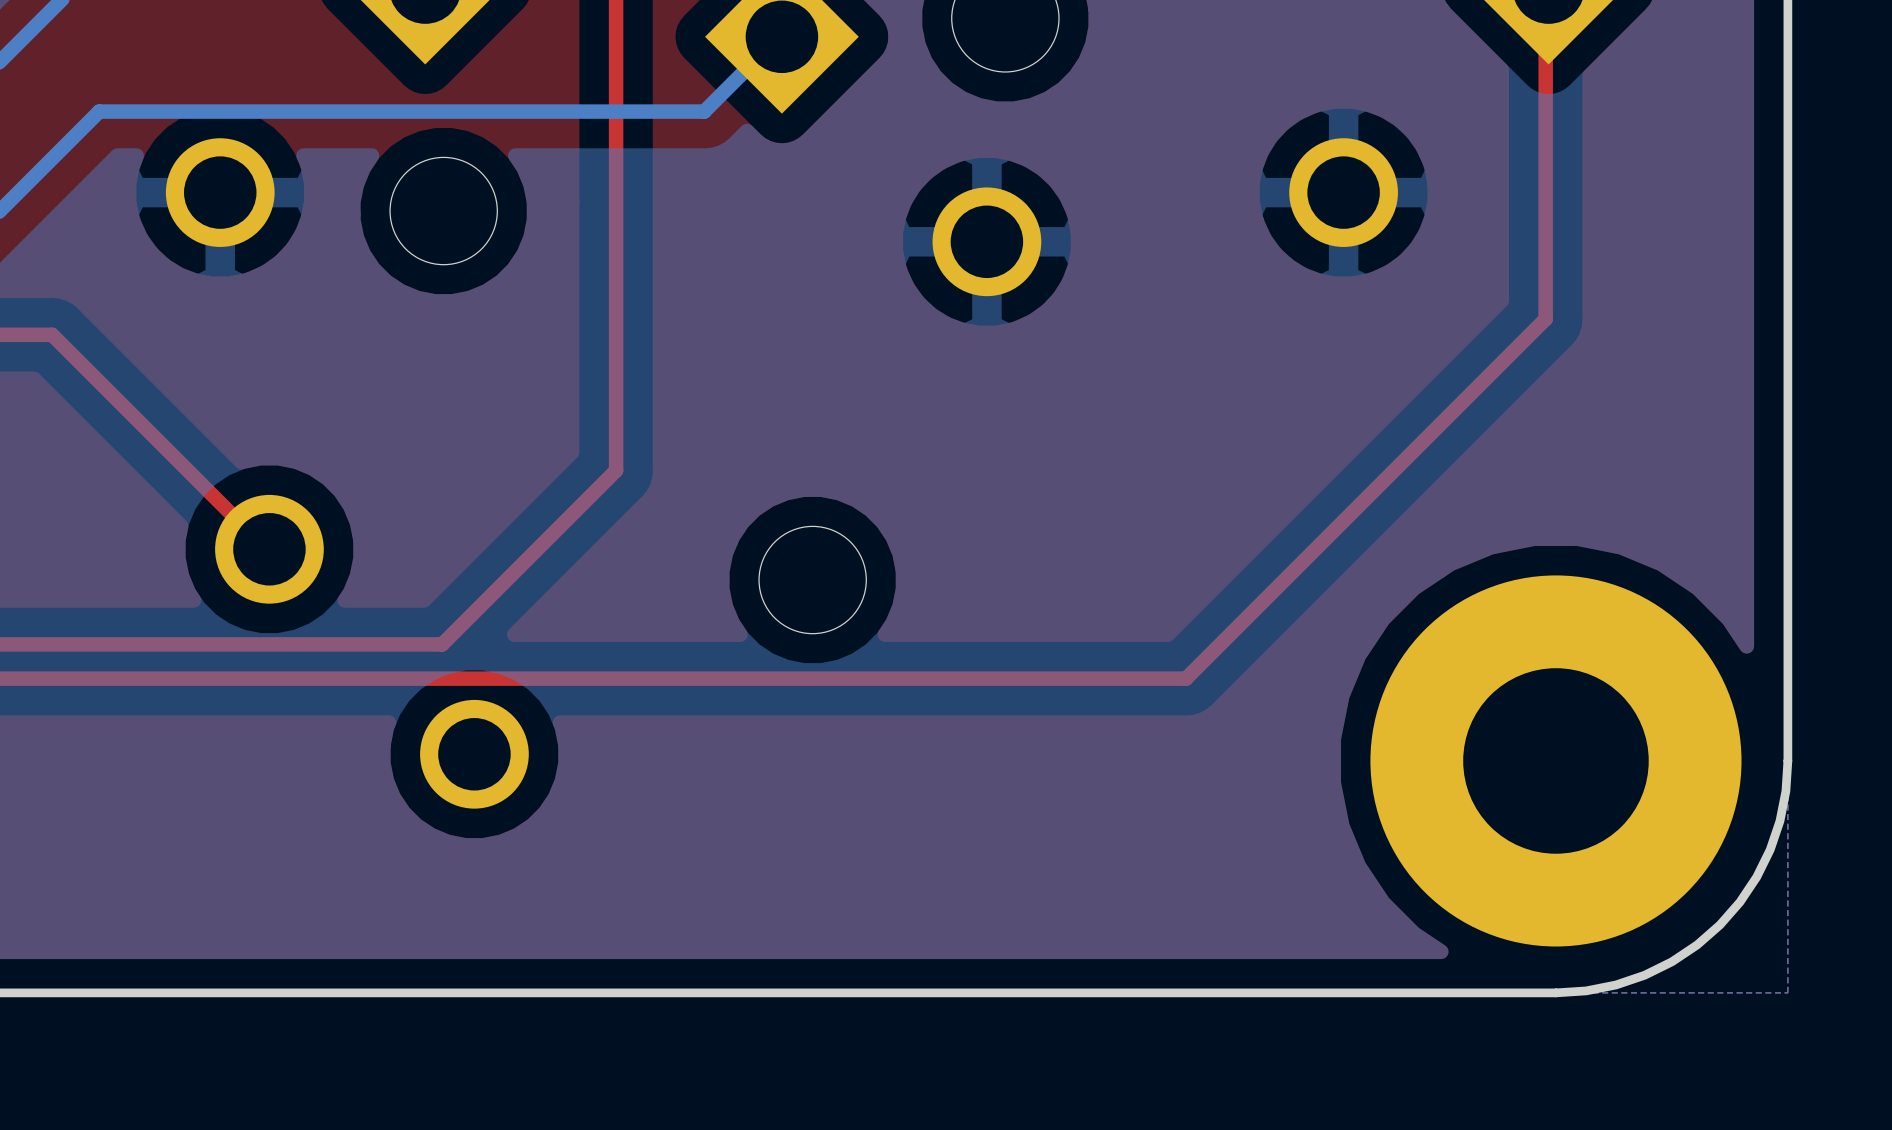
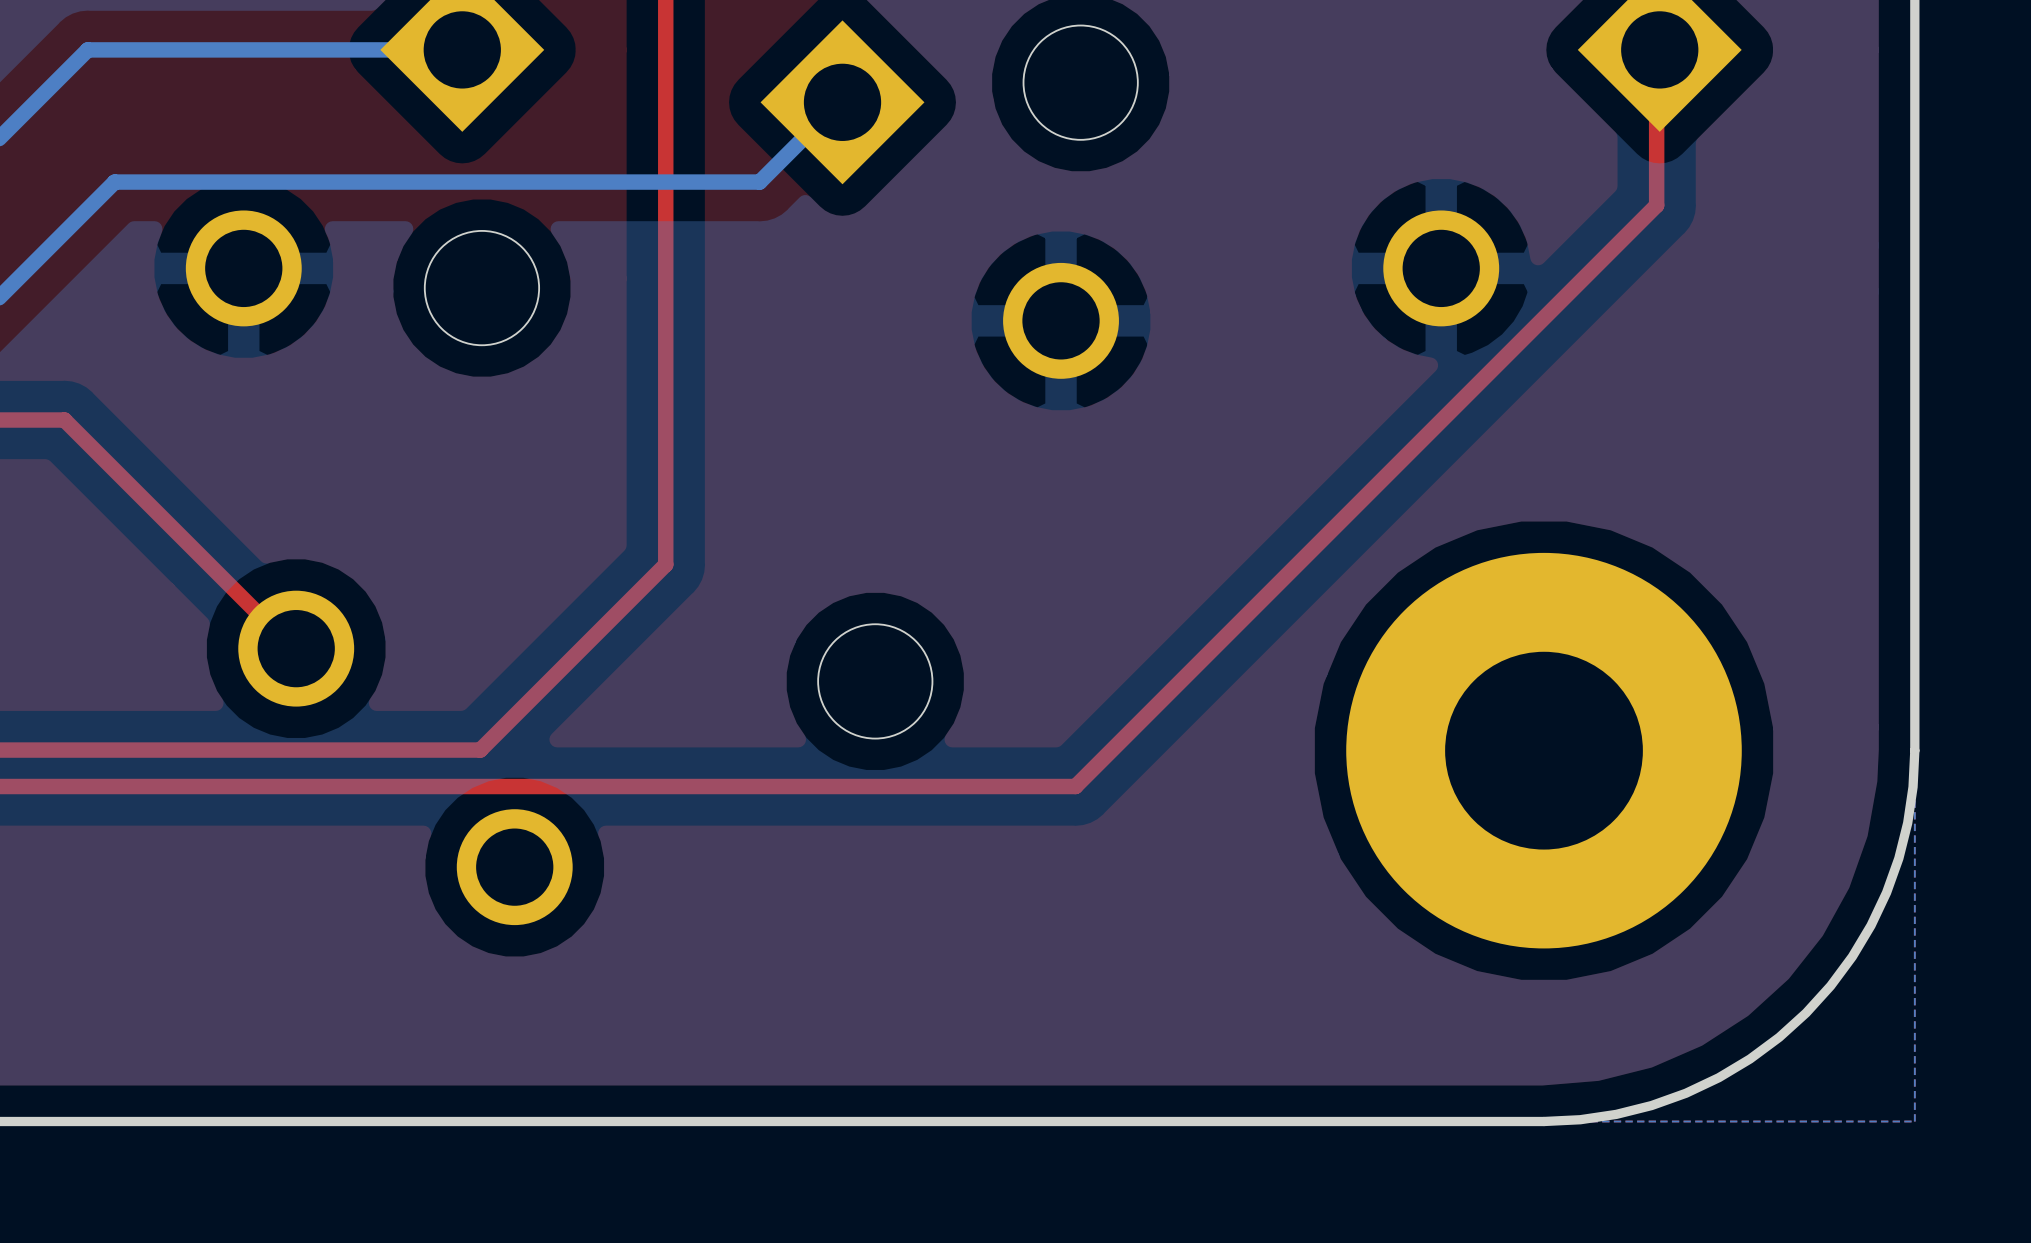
top track: (1545, 133) (1545, 318) (1186, 678) (1000, 678) -> (1656, 205) (1075, 786)
board edge: (1787, 645) (1787, 760) (1785, 791) (1779, 820) (1770, 849) (1756, 876) (1739, 902) (1719, 924) (1697, 944) (1671, 961) (1644, 975) (1615, 984) (1586, 990) (1555, 992) (1440, 992) -> (1914, 750) (1913, 787) (1907, 823) (1898, 858) (1886, 892) (1871, 925) (1852, 956) (1830, 985) (1806, 1012) (1779, 1037) (1750, 1059) (1718, 1077) (1685, 1093) (1651, 1105) (1616, 1114) (1580, 1119) (1544, 1121)
part position: (1555, 760) -> (1544, 750)

